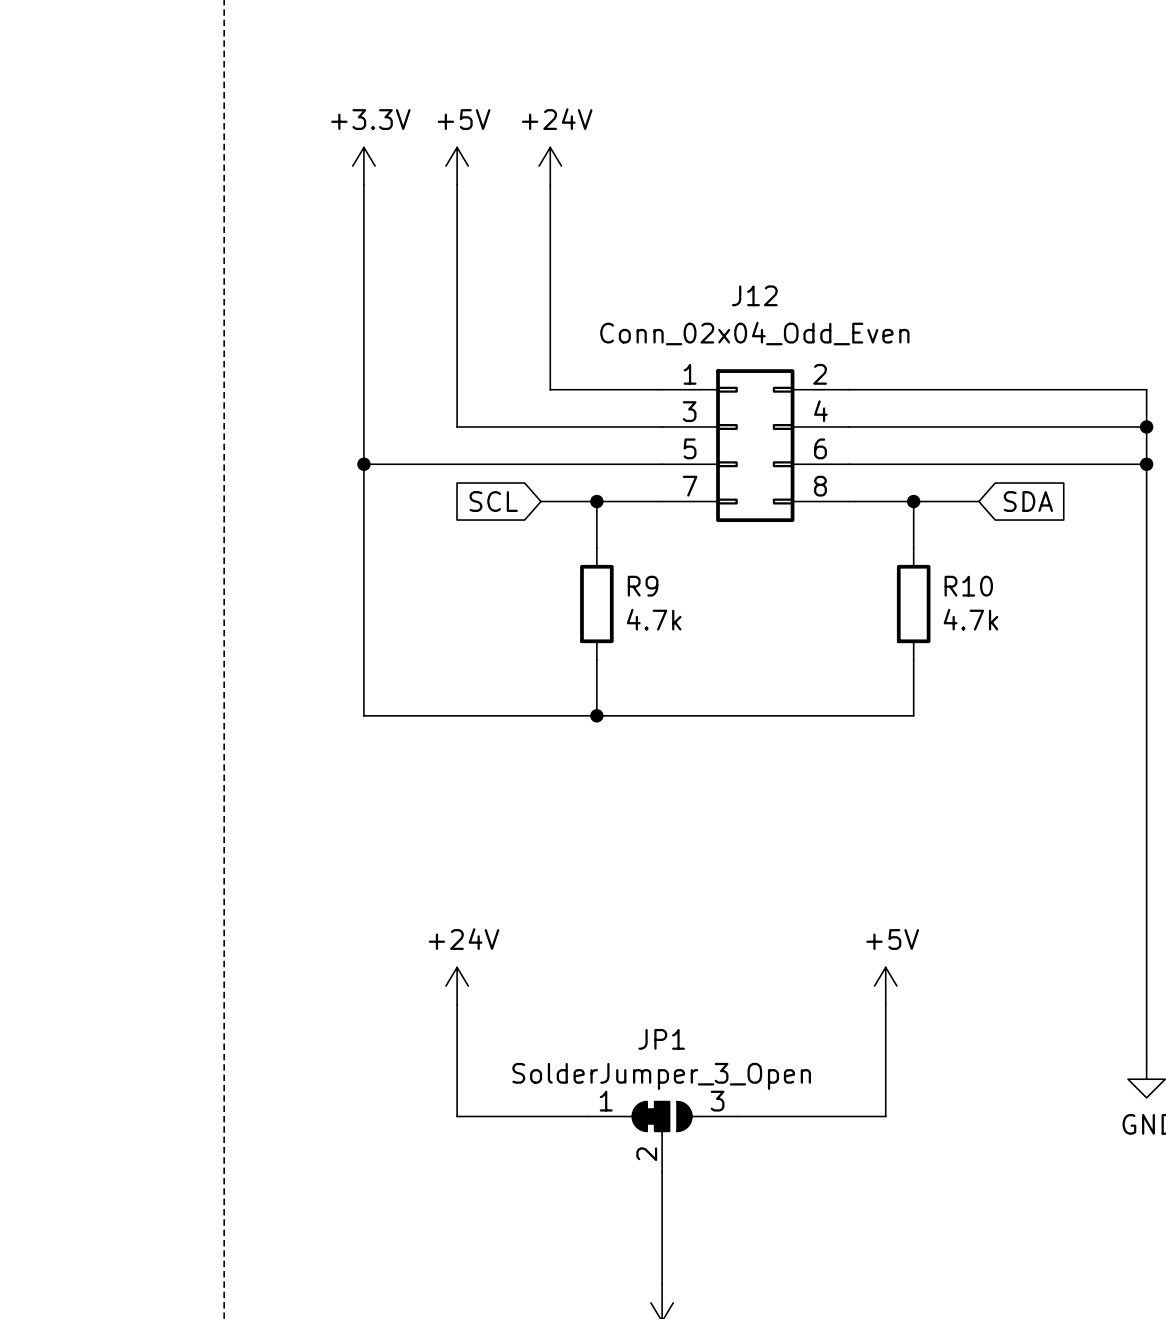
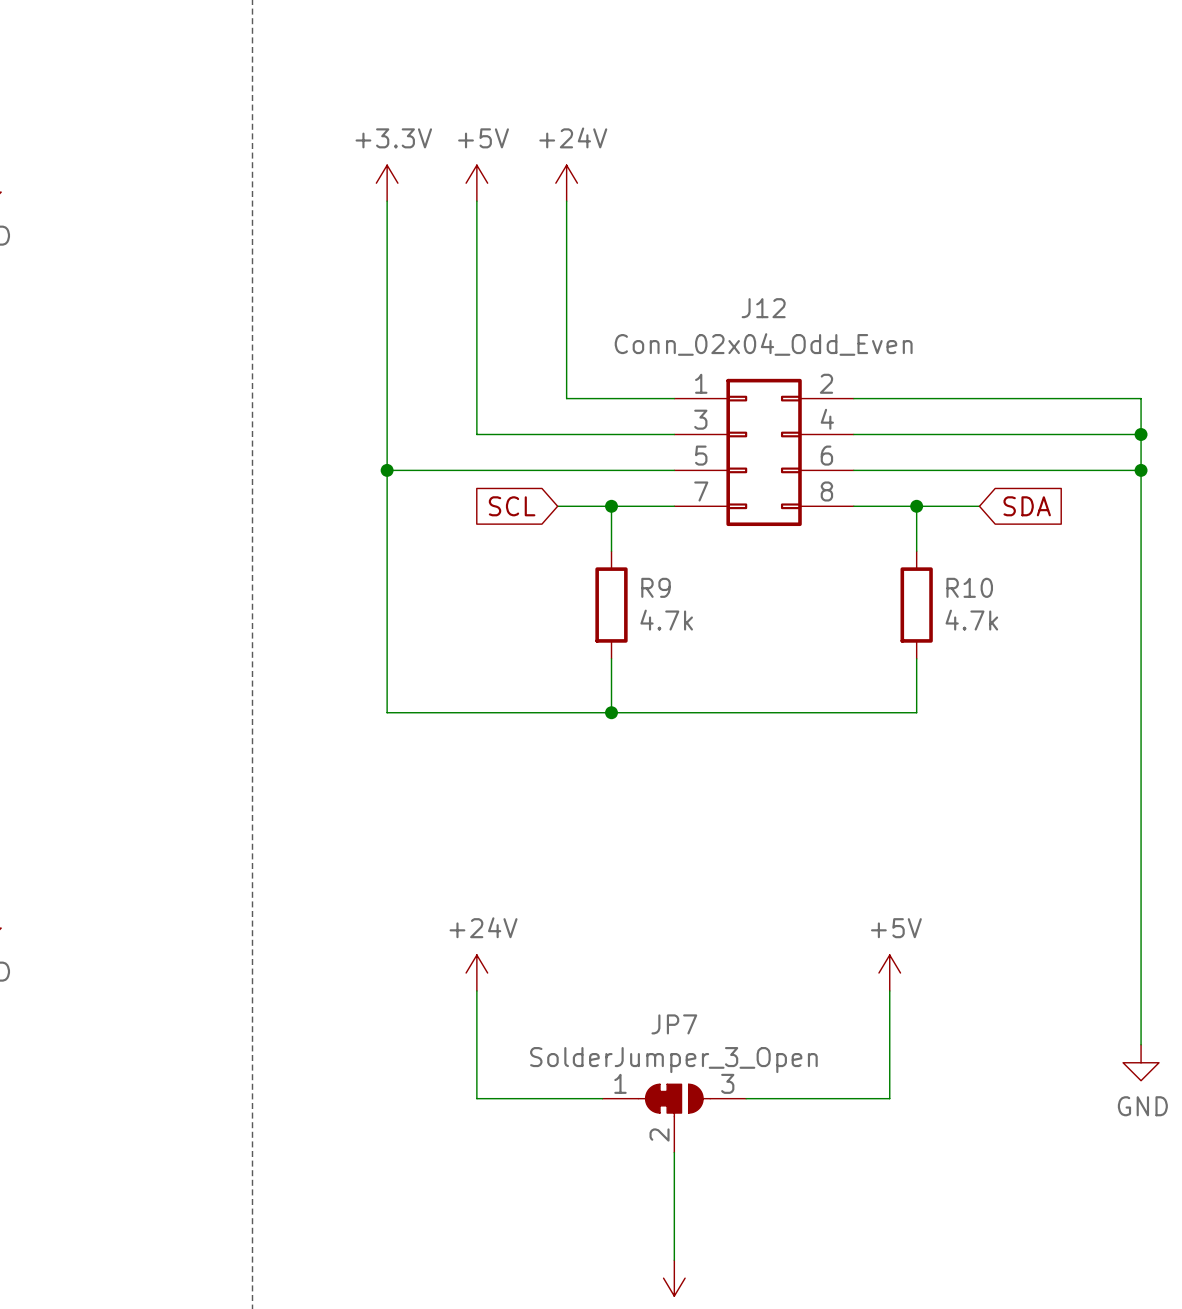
JP1 name: JP1 (661, 1039) -> JP7 (674, 1024)

